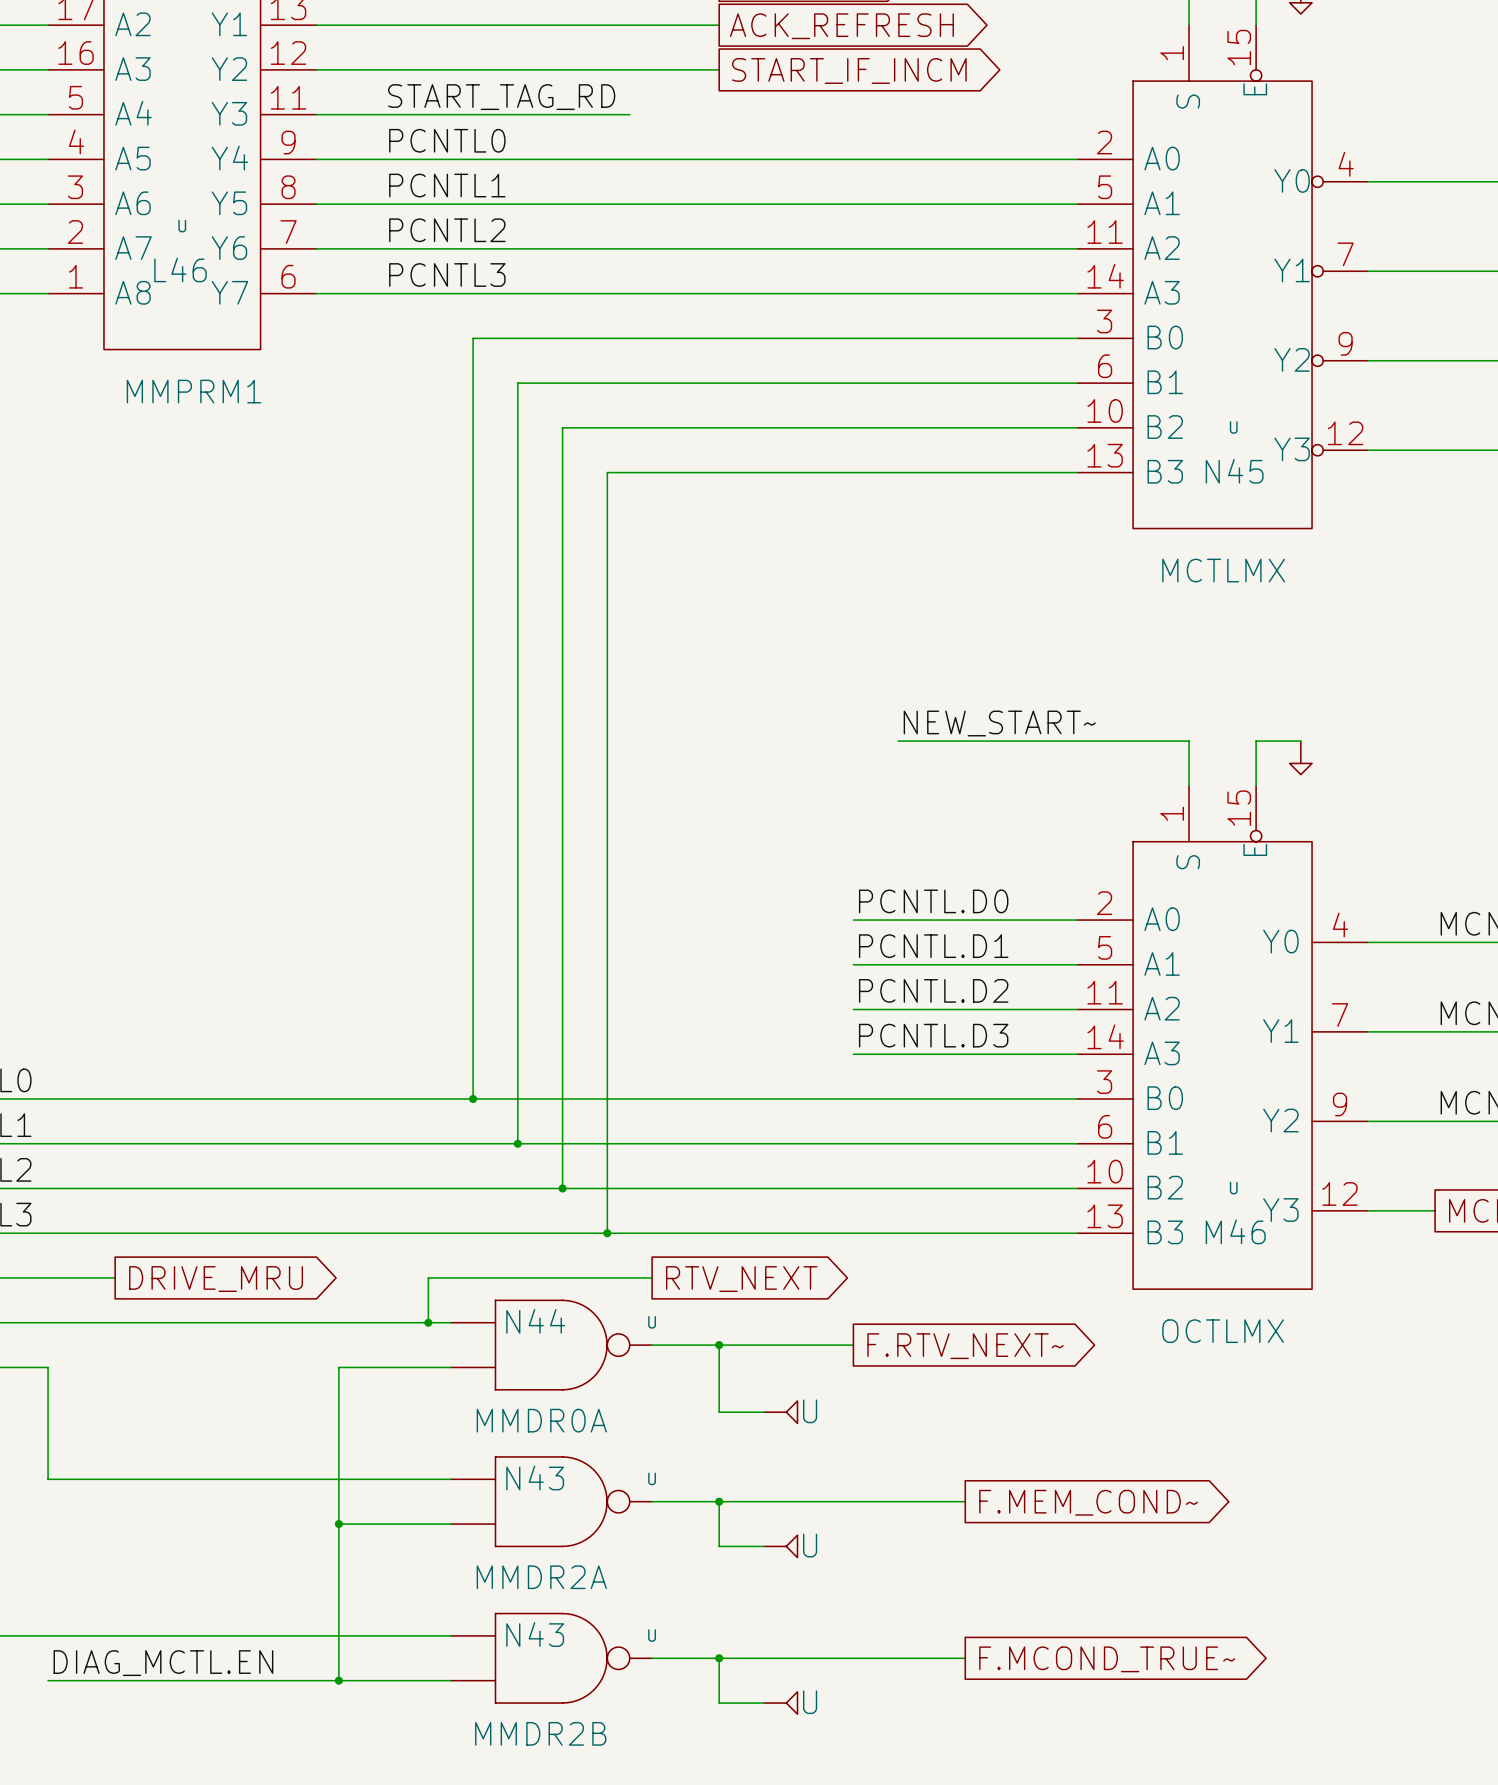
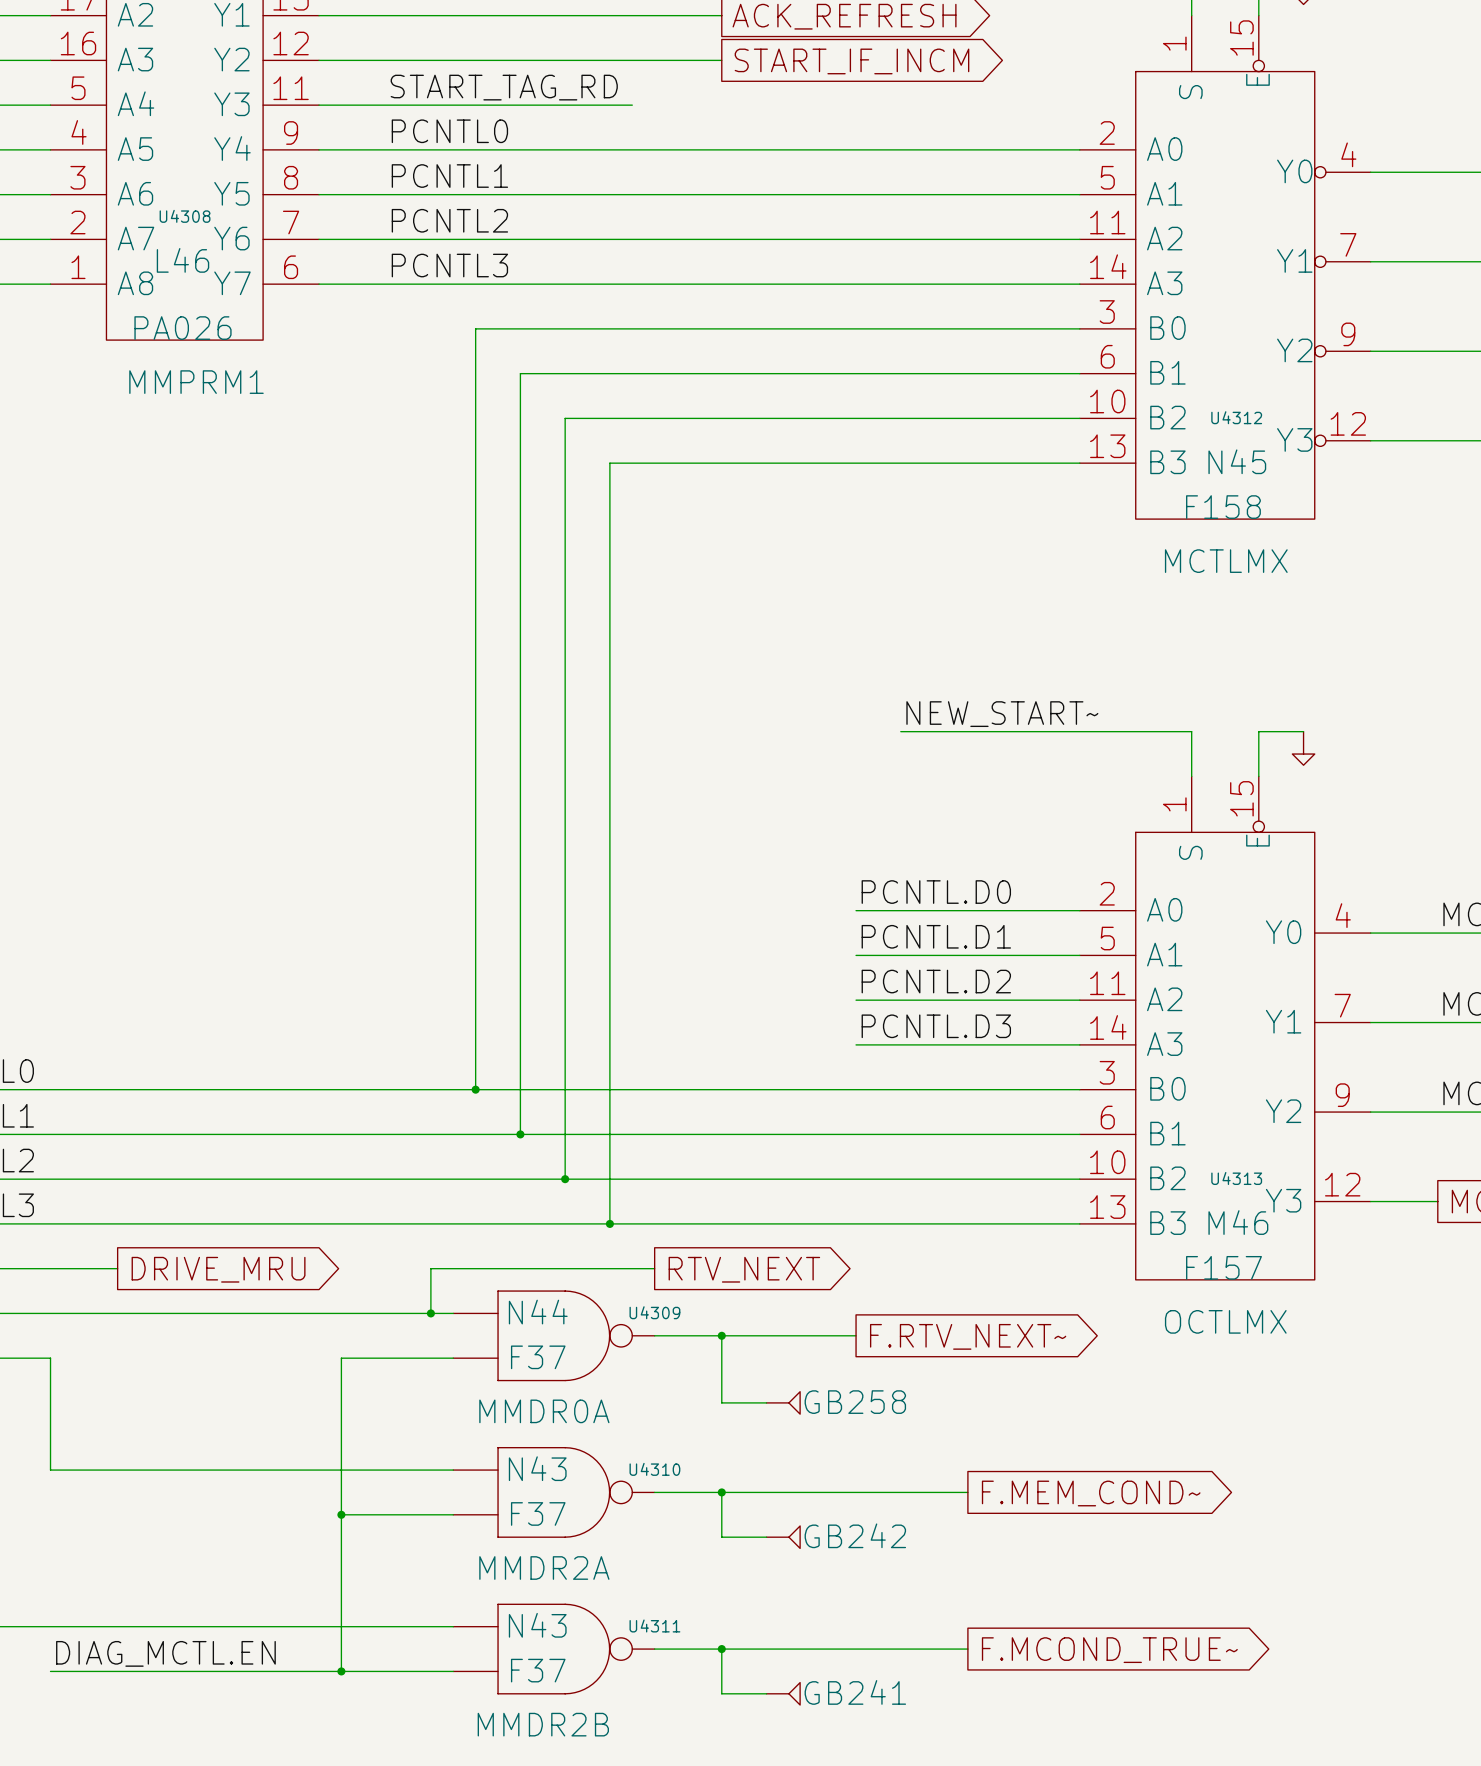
U name: U (182, 226) -> U4308 (185, 216)
U value: none -> PA026 (182, 328)
U name: U (1233, 427) -> U4312 (1236, 417)
U value: none -> F158 (1223, 507)
U name: U (1233, 1188) -> U4313 (1236, 1178)
U value: none -> F157 (1223, 1267)
U name: U (652, 1322) -> U4309 (654, 1312)
U value: none -> F37 (538, 1357)
U name: U (810, 1411) -> GB258 (855, 1402)
U name: U (652, 1478) -> U4310 (654, 1469)
U value: none -> F37 (538, 1513)
U name: U (810, 1545) -> GB242 (855, 1535)
U name: U (652, 1635) -> U4311 (654, 1626)
U value: none -> F37 (538, 1670)
U name: U (810, 1702) -> GB241 (855, 1692)

